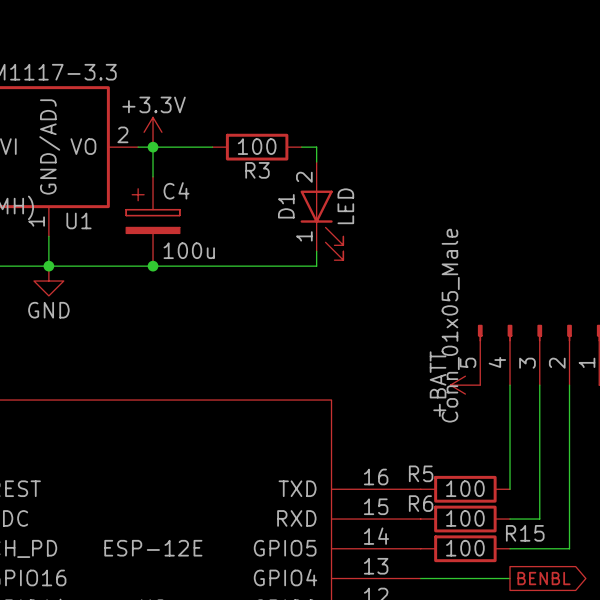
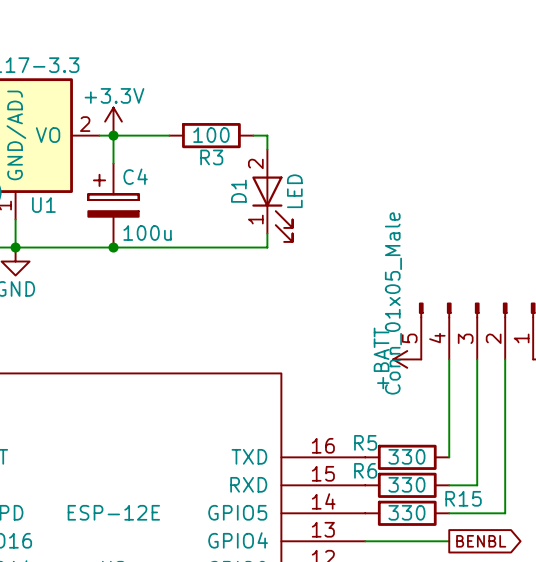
R5 value: 100 (465, 488) -> 330 (406, 456)
R6 value: 100 (465, 518) -> 330 (406, 484)
R15 value: 100 (465, 548) -> 330 (406, 512)

